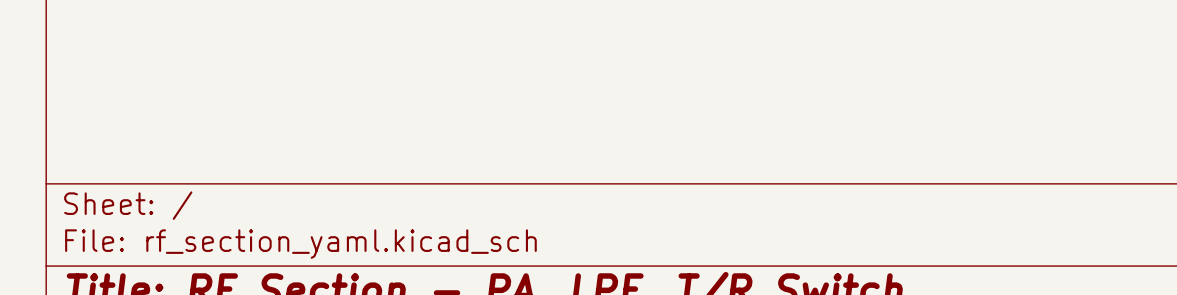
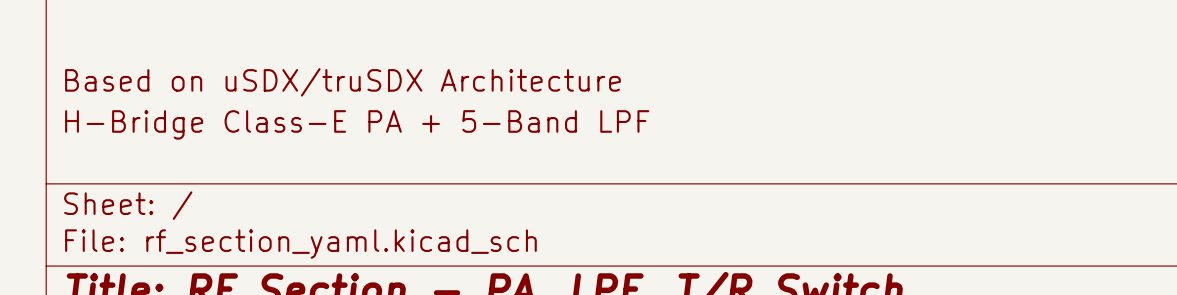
title block: none -> Based on uSDX/truSDX Architecture (343, 82)
title block: none -> H-Bridge Class-E PA + 5-Band LPF (357, 124)

